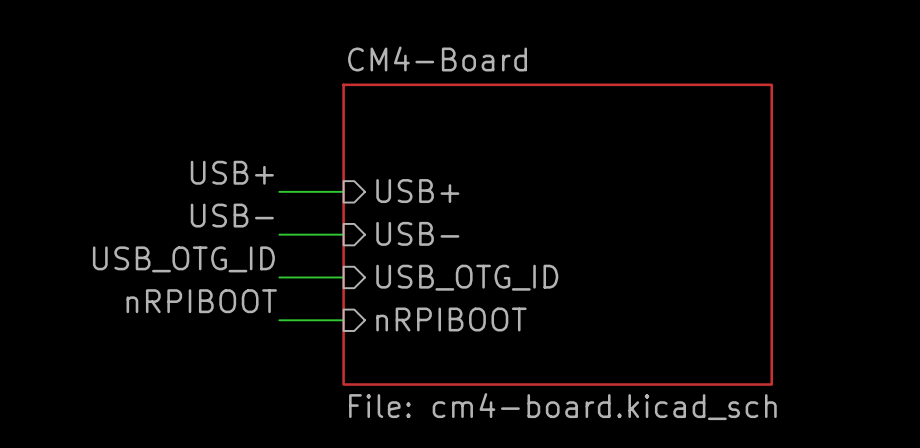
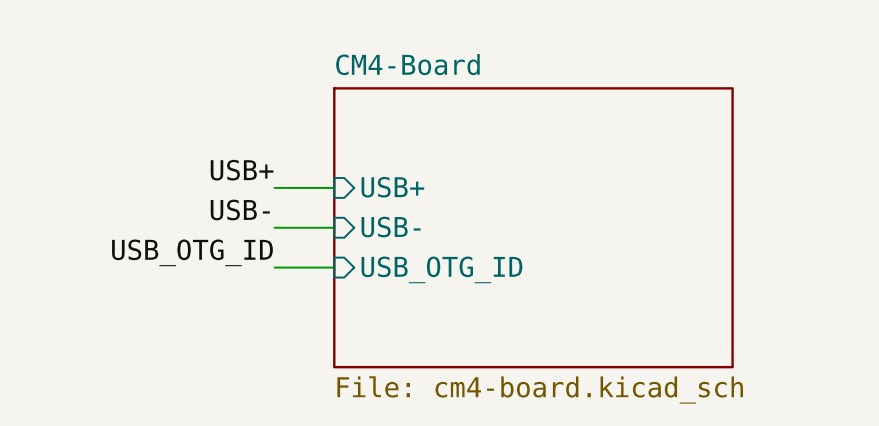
label: nRPIBOOT (201, 301) -> none
sheet pin: nRPIBOOT (451, 319) -> none
wire: (279, 320) (343, 320) -> none

